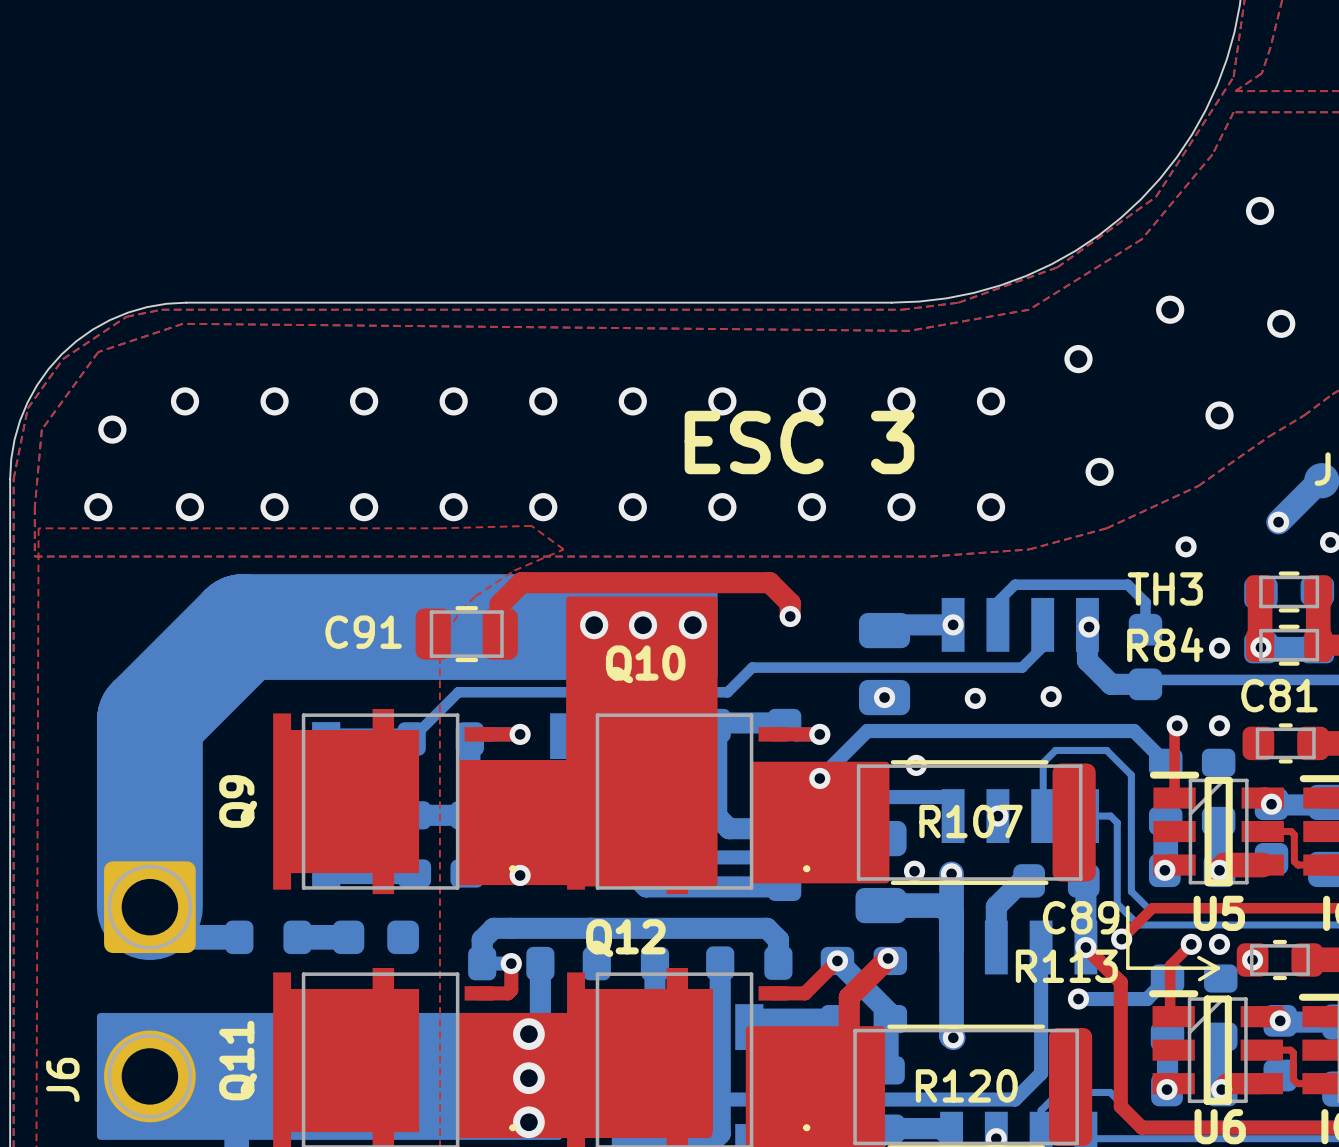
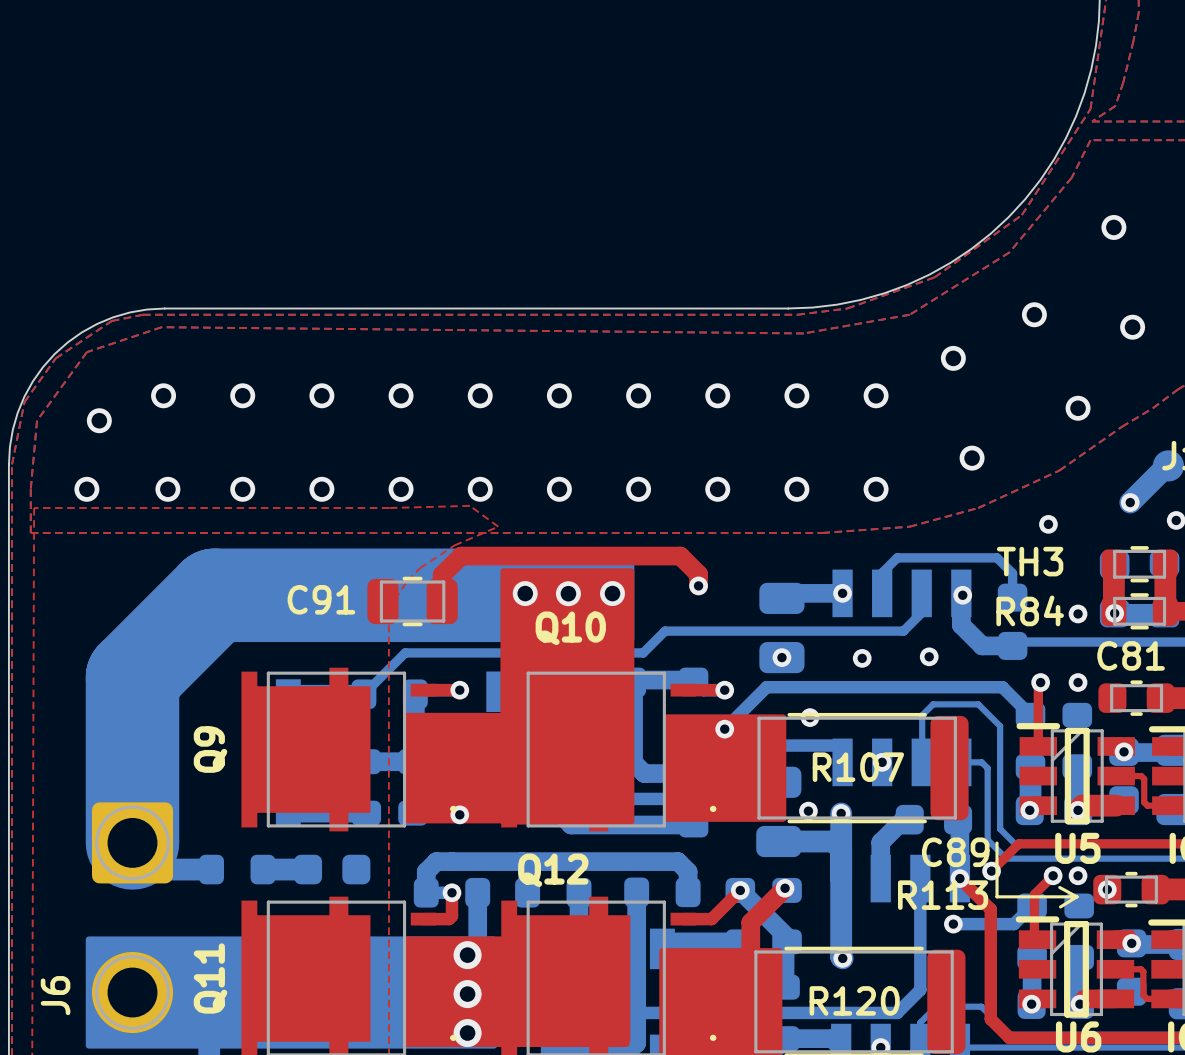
text: ESC 3 (799, 442) -> none

